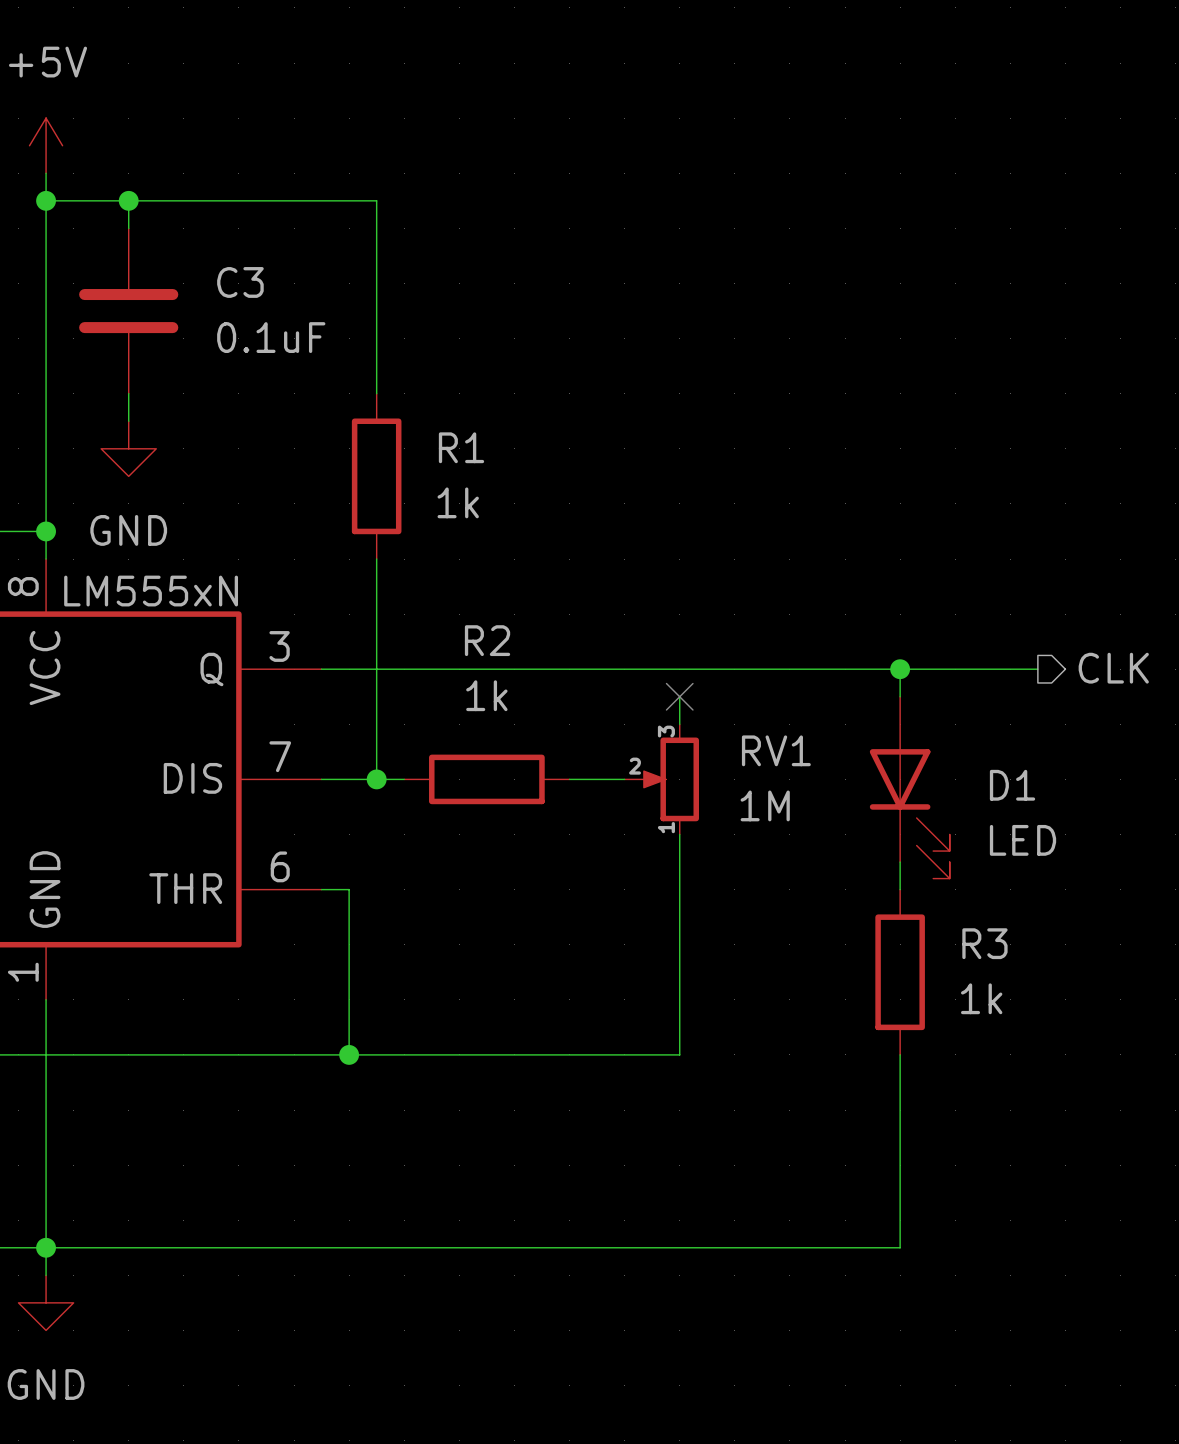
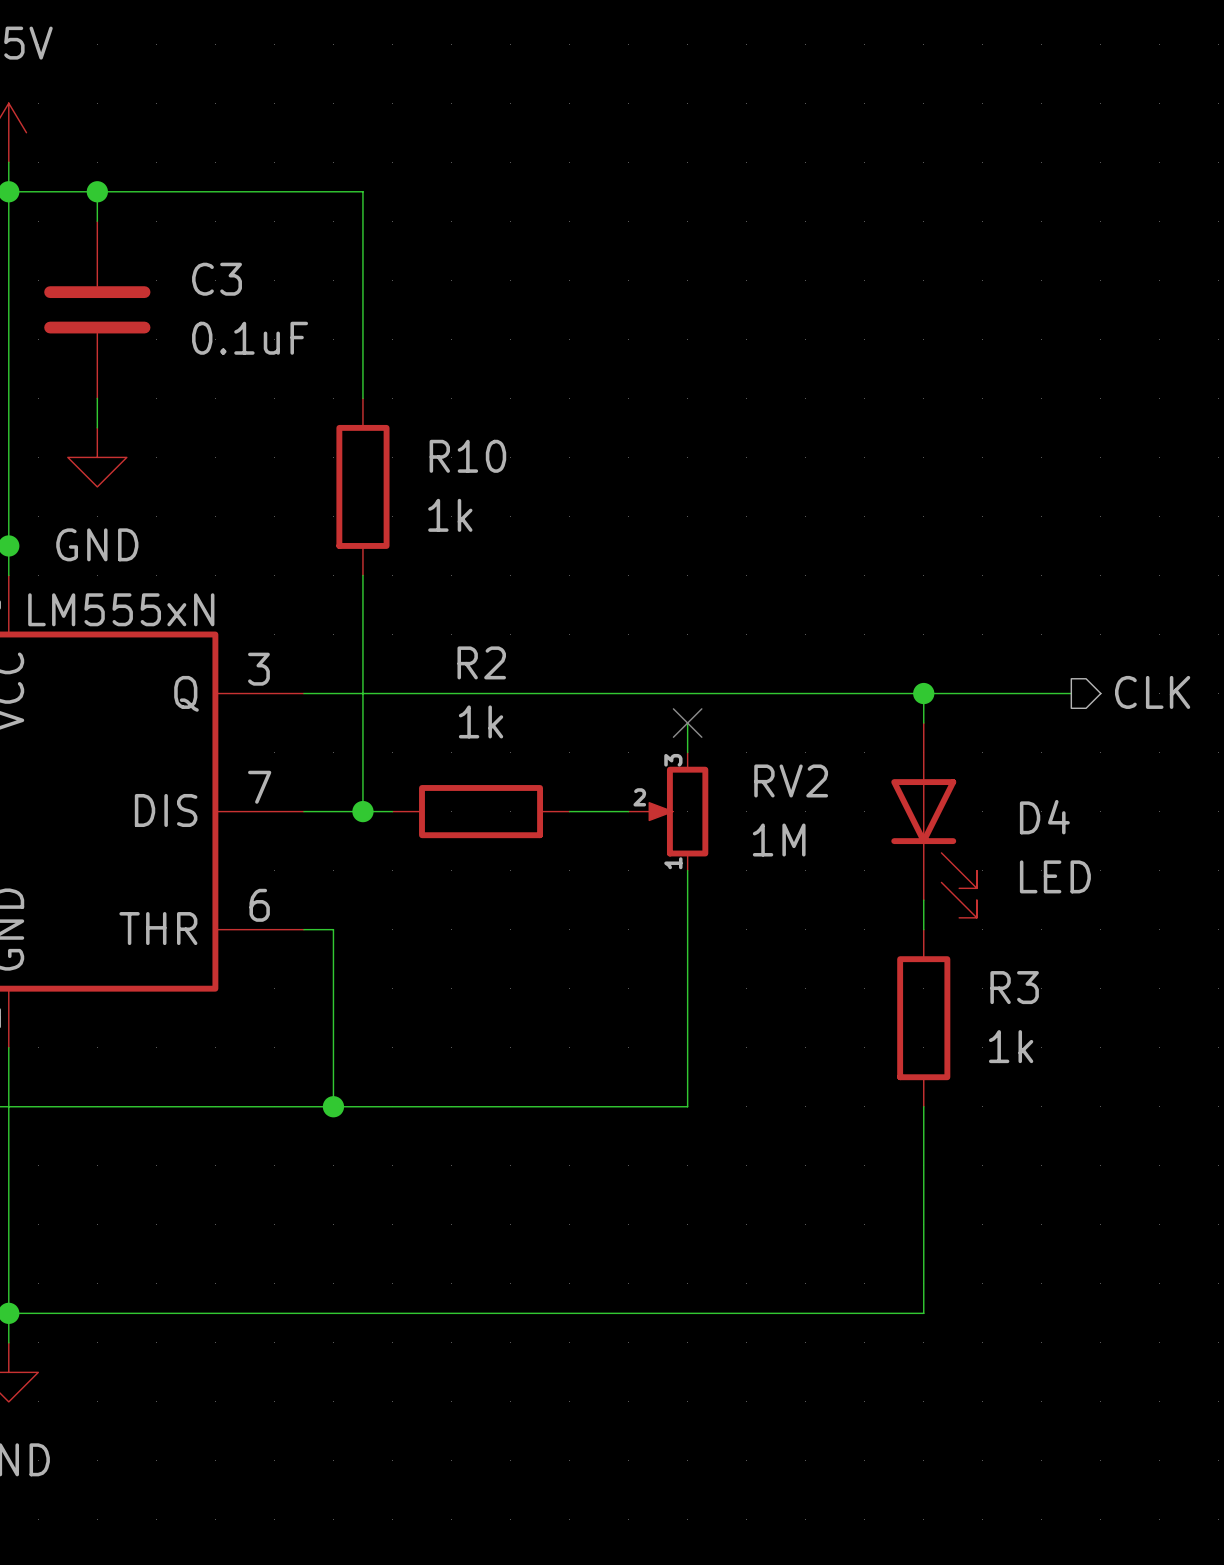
R1 name: R1 (461, 447) -> R10 (467, 456)
RV1 name: RV1 (776, 750) -> RV2 (791, 780)
D1 name: D1 (1012, 785) -> D4 (1044, 817)

